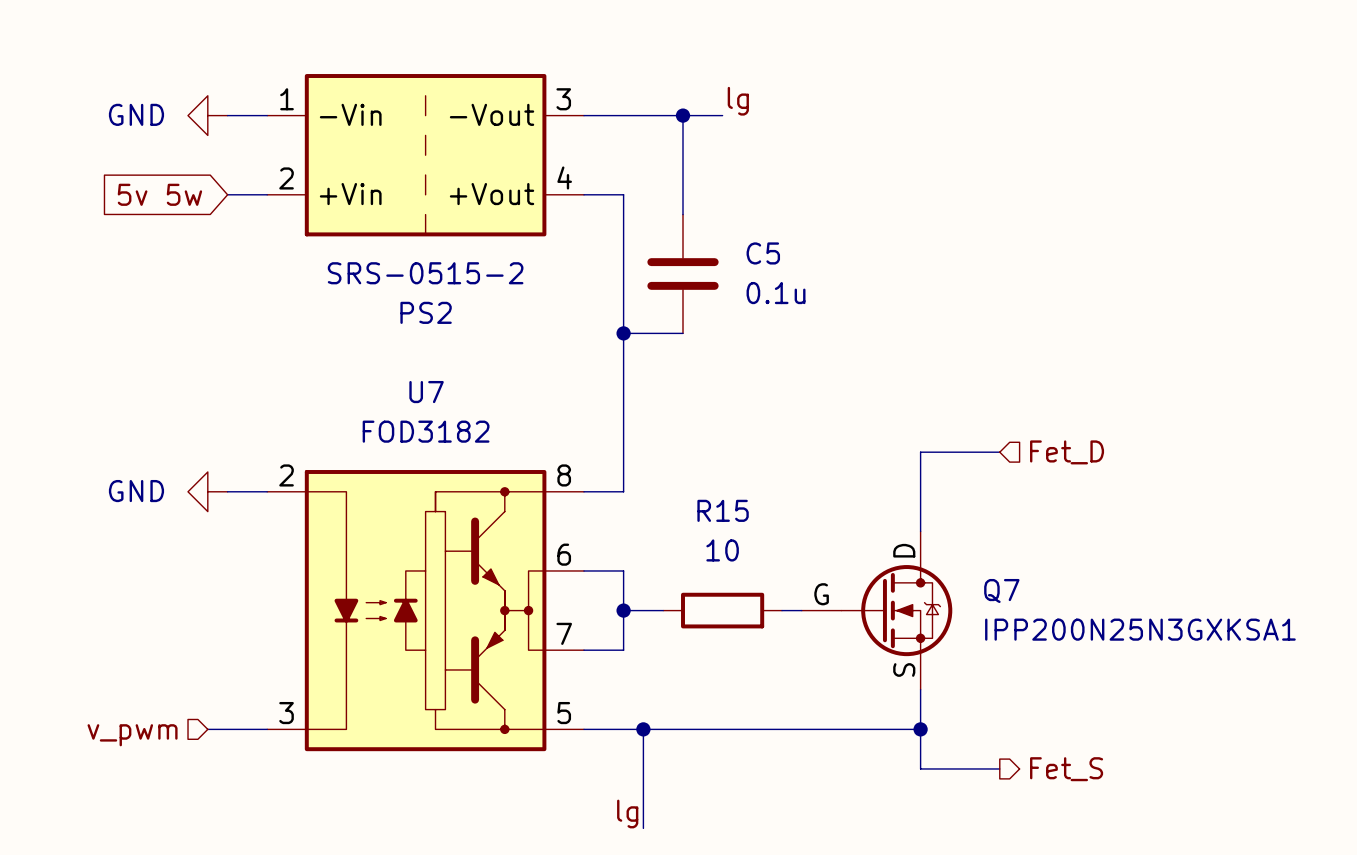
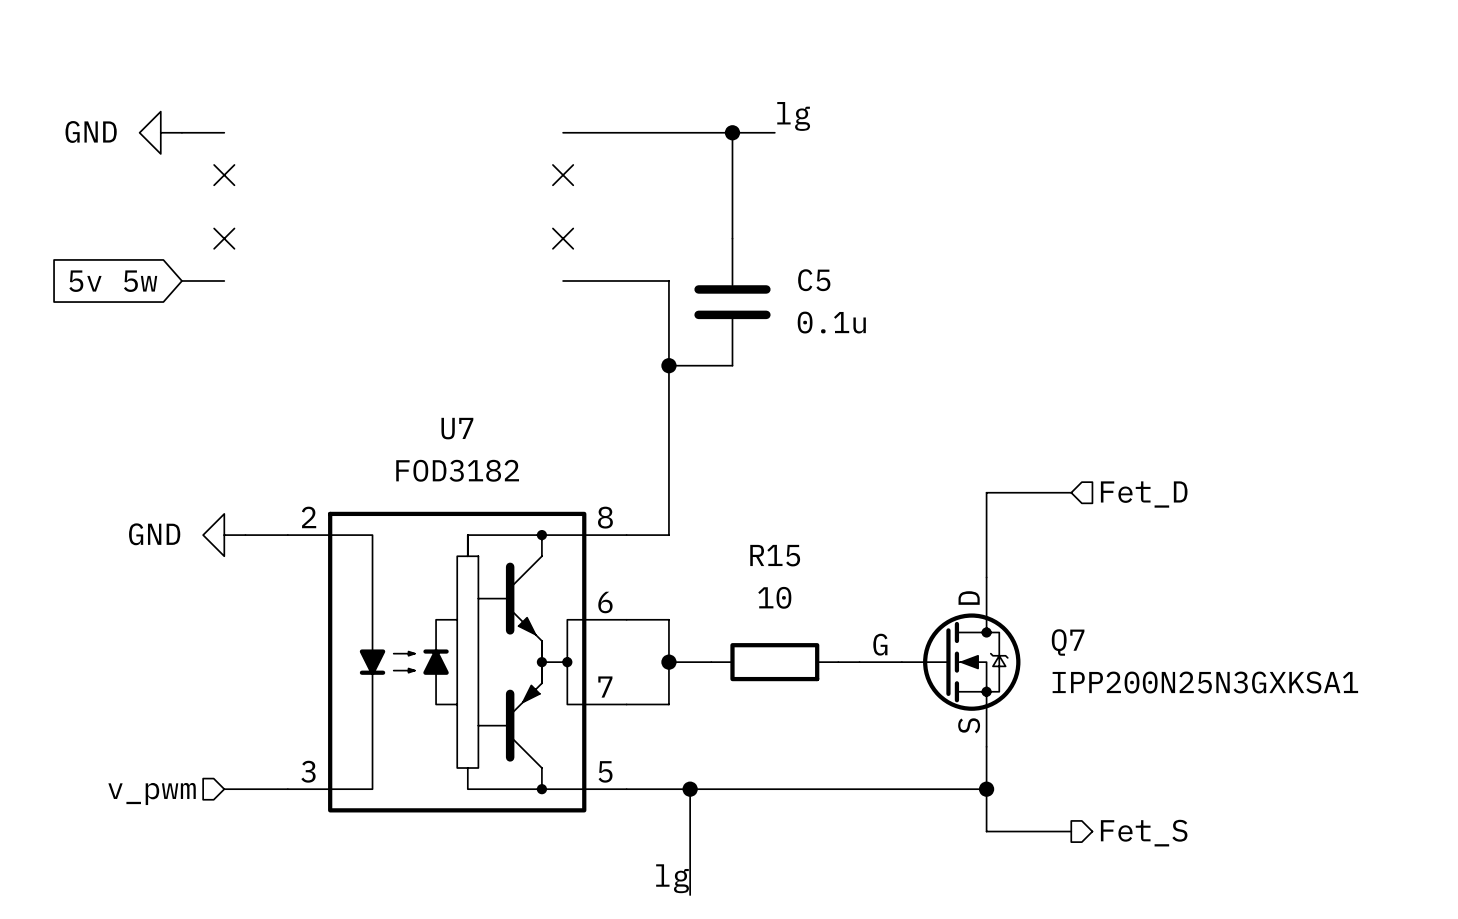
power symbol position: GND (207, 115) -> GND (160, 132)
wire: (227, 115) (267, 115) -> (181, 132) (224, 132)
no-connect mark: none -> (224, 175)
PS2: SRS-0515-2 (425, 155) -> none
no-connect mark: none -> (563, 175)
global label position: 5v 5w (159, 194) -> 5v 5w (113, 281)
wire: (227, 194) (267, 194) -> (181, 280) (224, 280)
wire: (584, 194) (623, 194) (623, 254) -> (563, 280) (668, 280)
no-connect mark: none -> (224, 238)
no-connect mark: none -> (563, 238)

